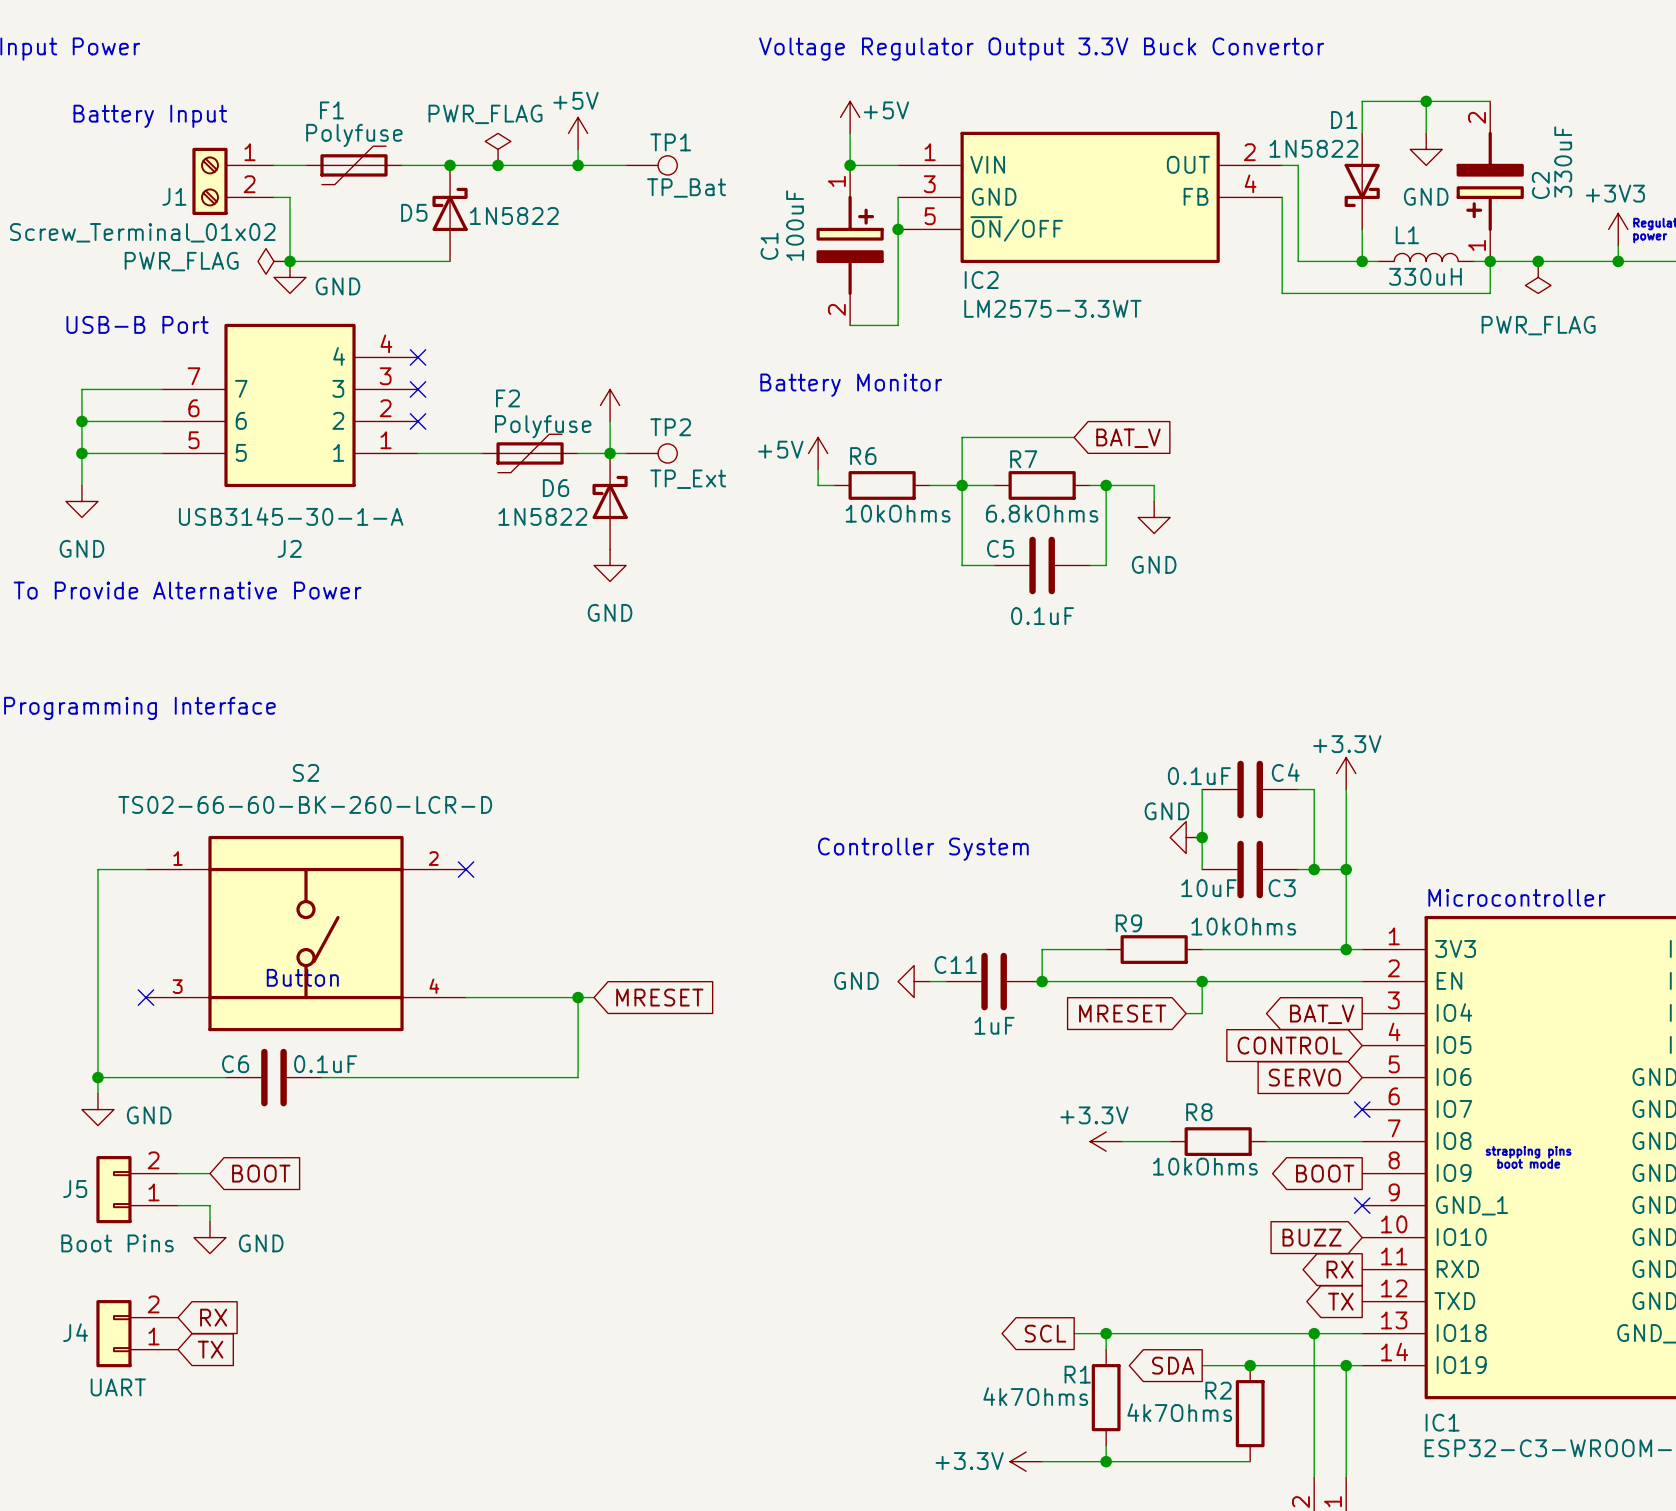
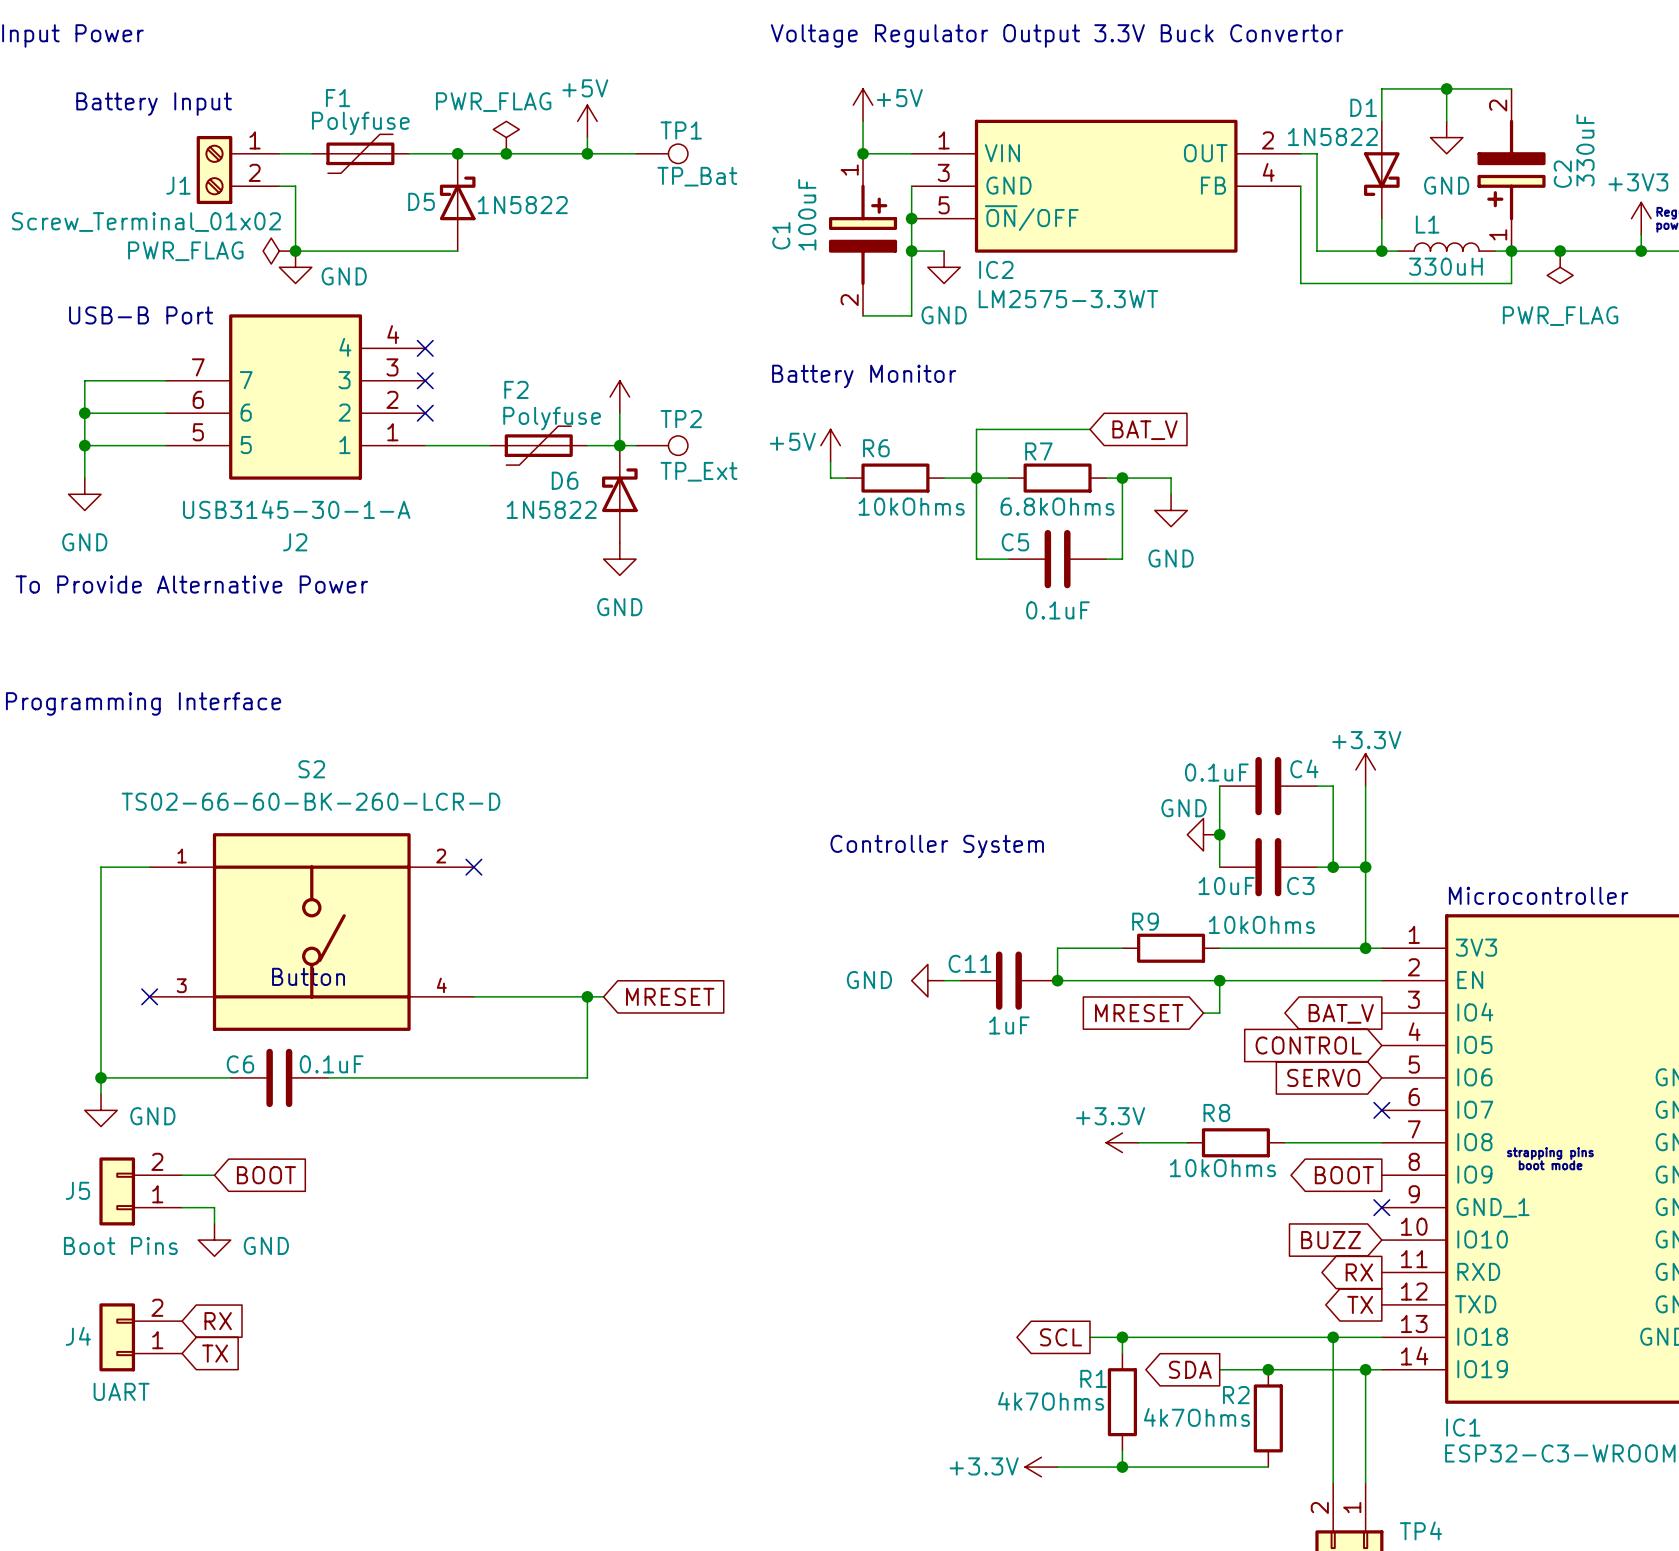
wire: none -> (911, 251) (944, 251)
junction: none -> (911, 251)
power symbol: none -> GND (944, 267)

